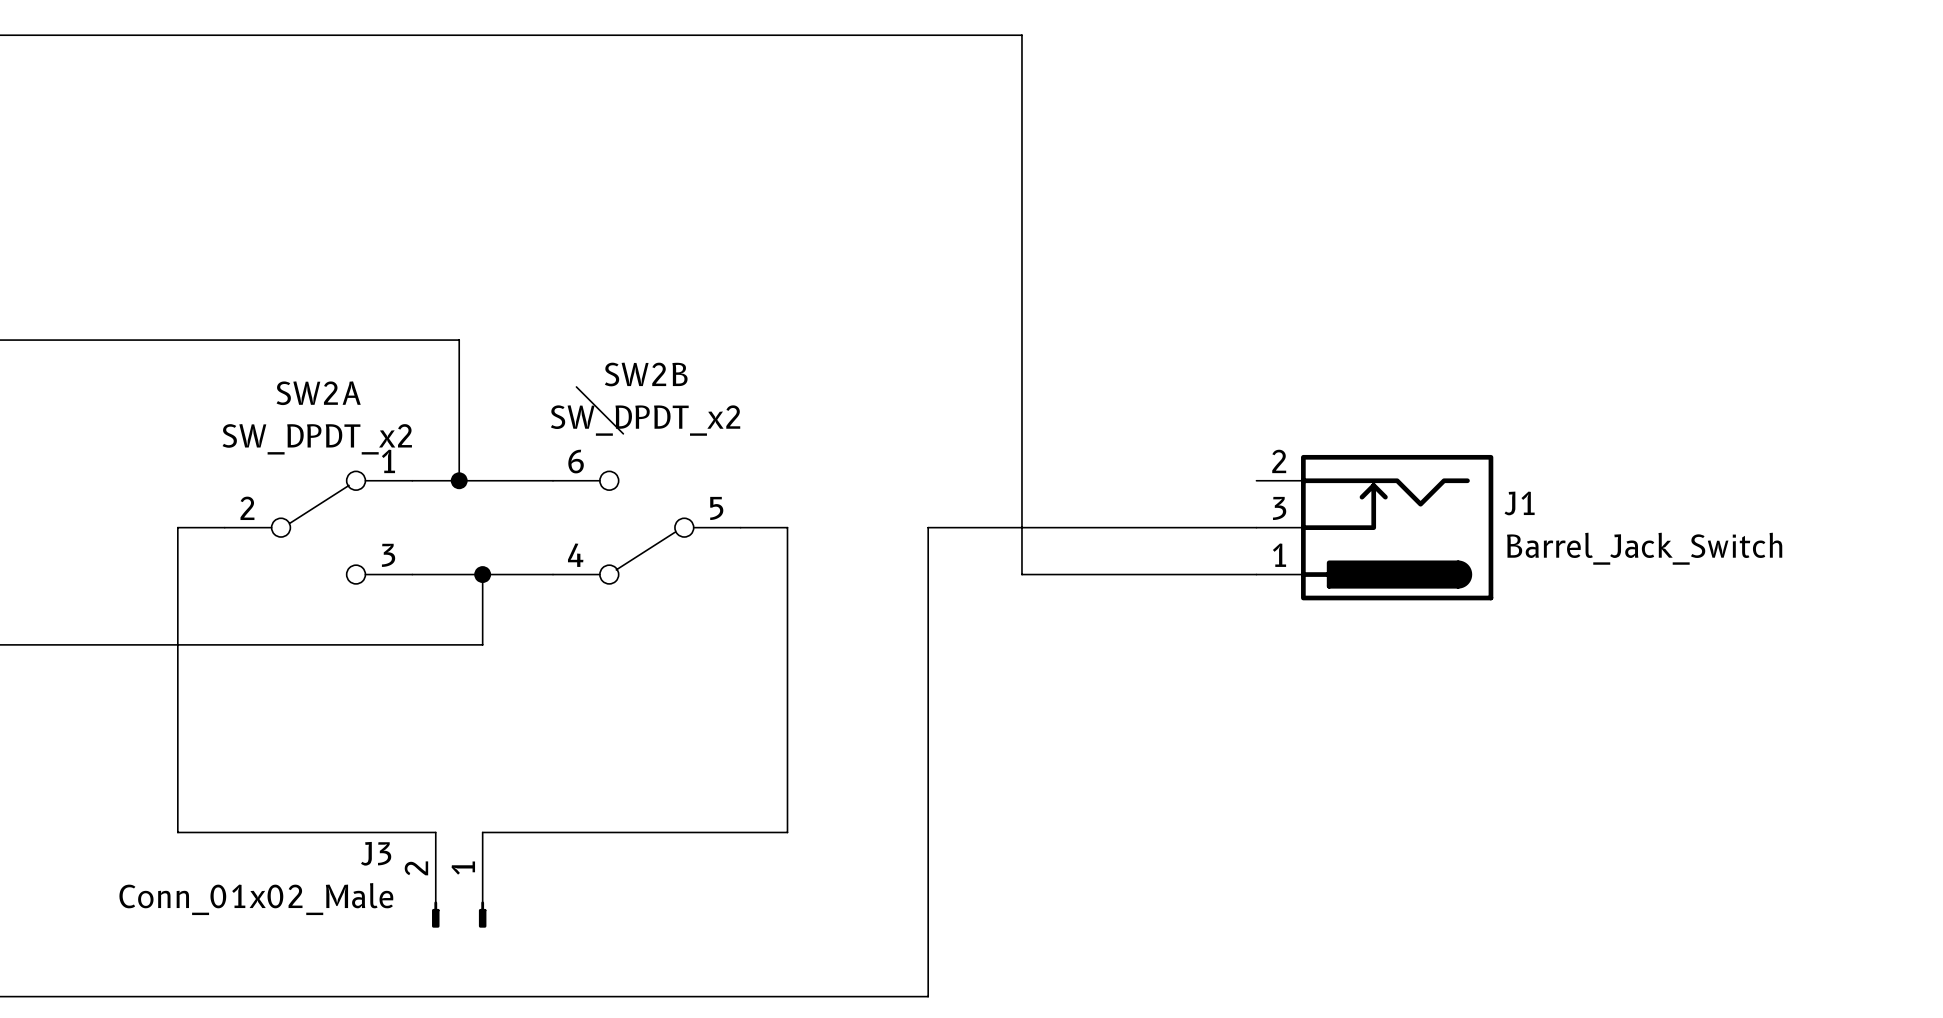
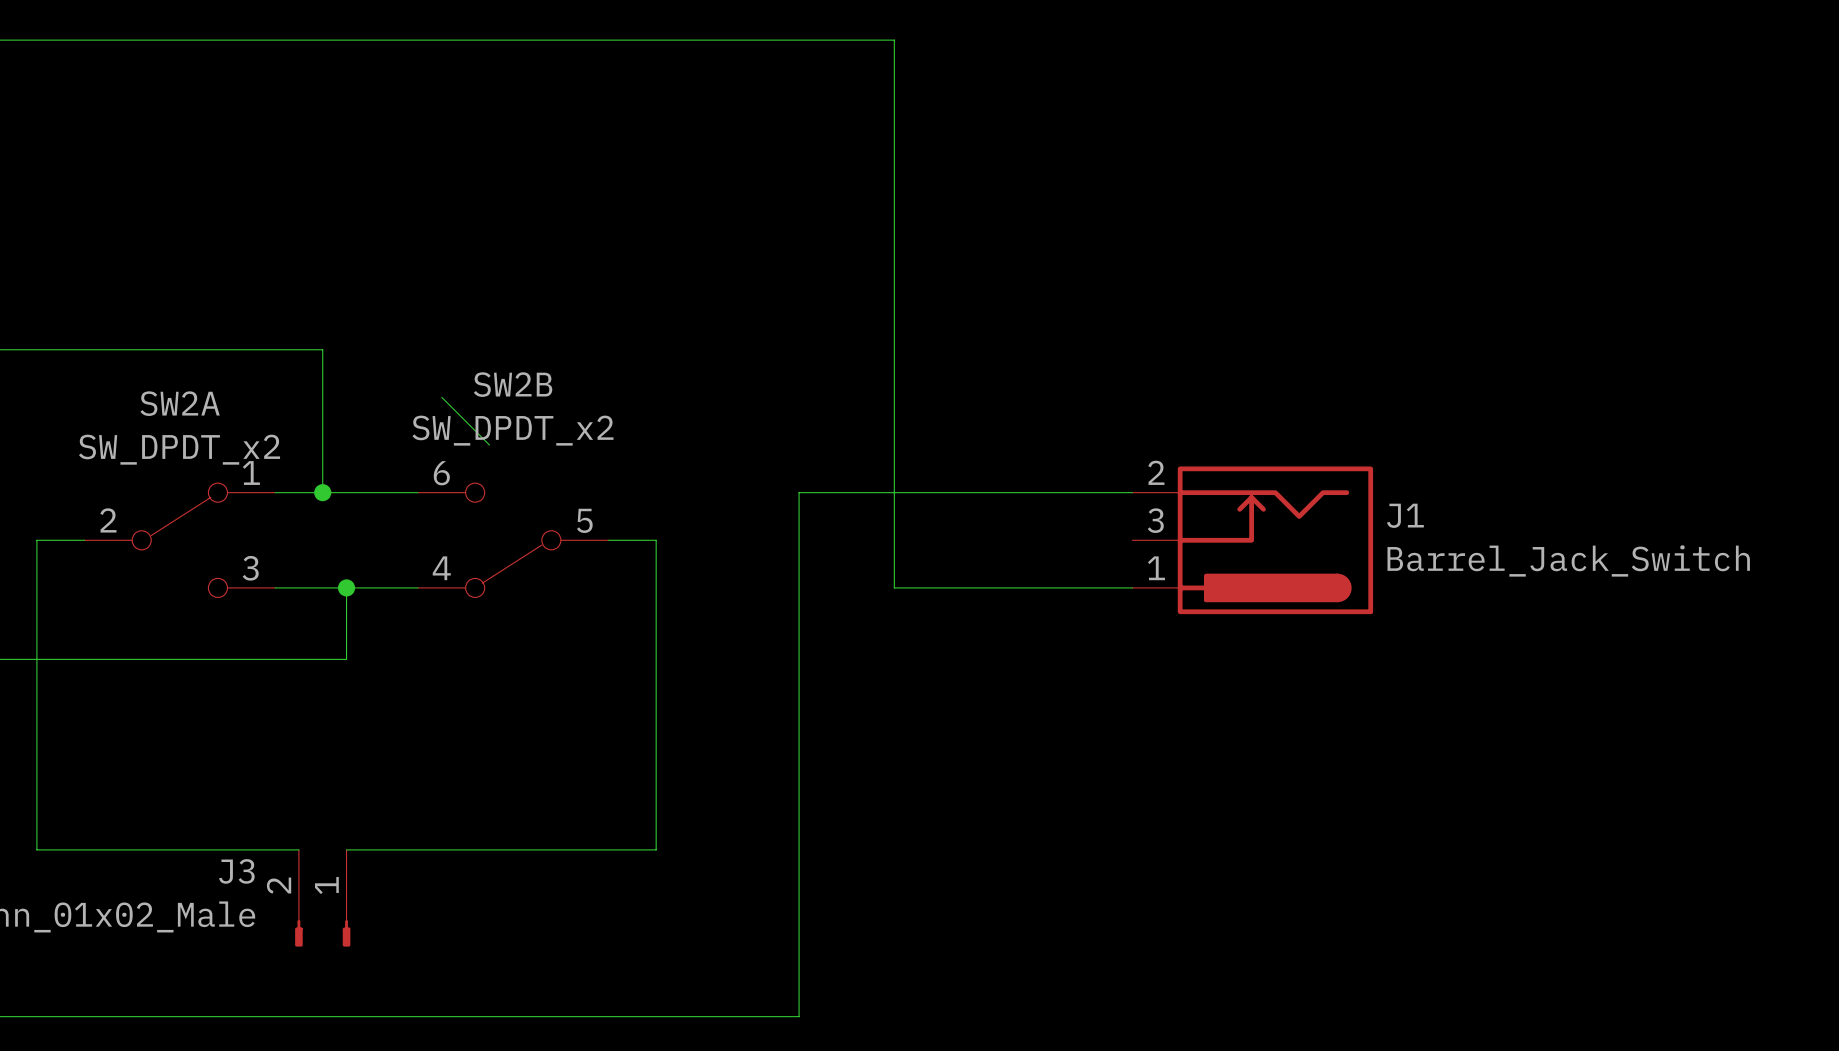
wire: (928, 527) (1256, 527) -> (799, 540) (799, 492) (1132, 492)

